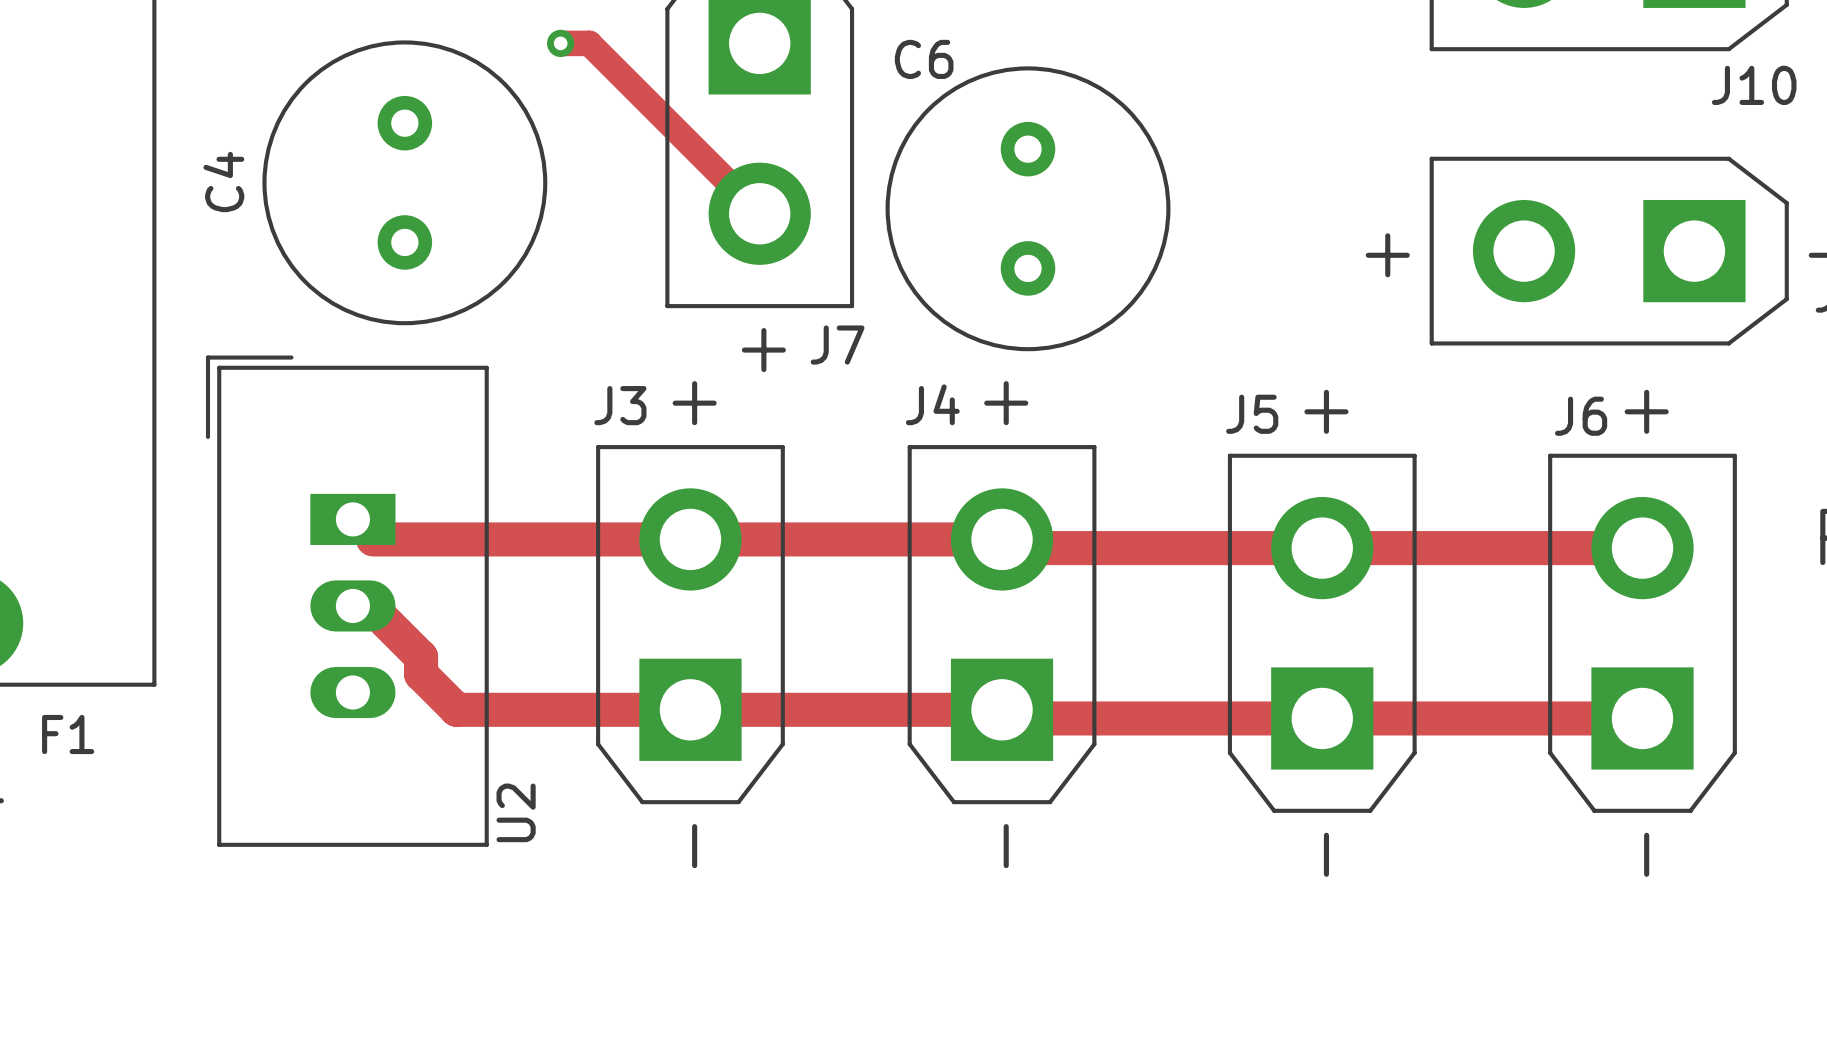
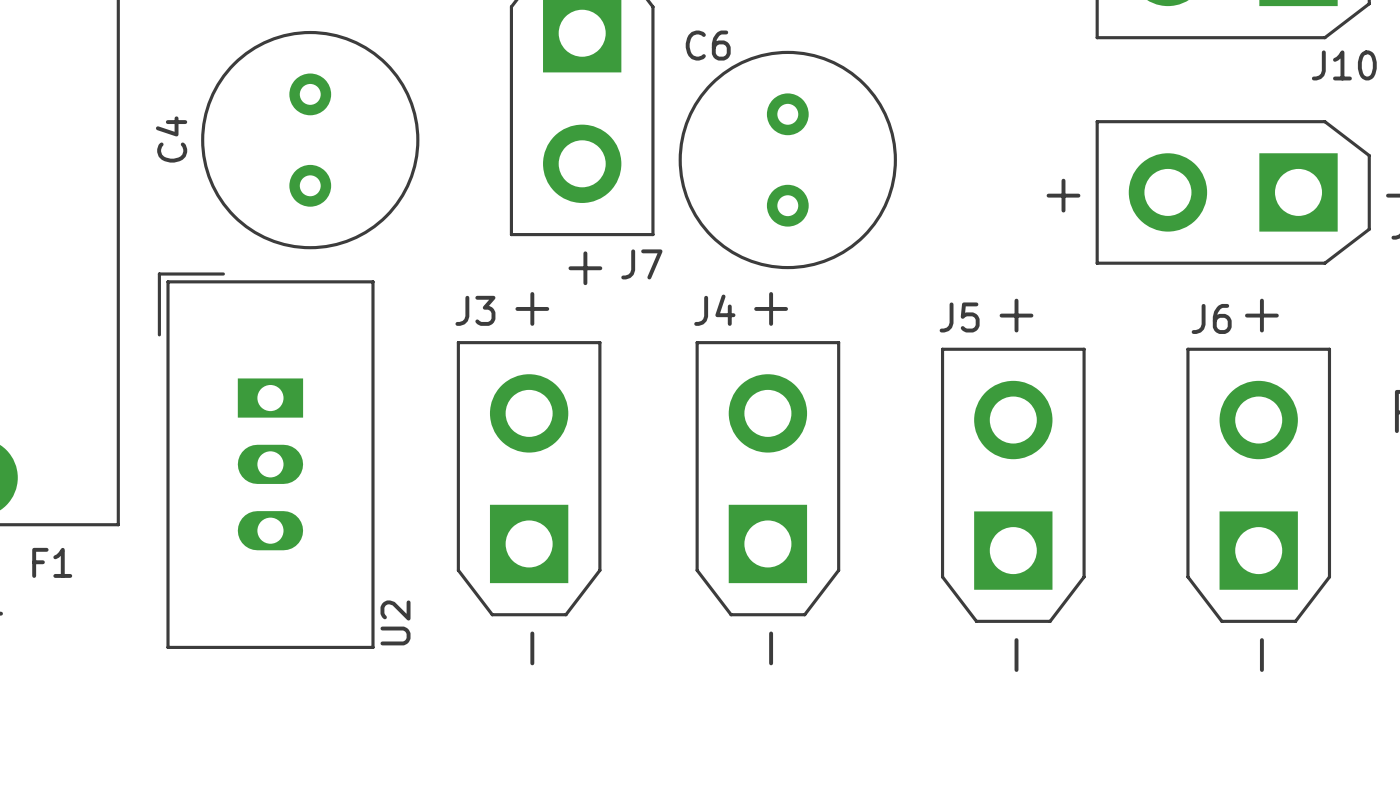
track: (560, 43) (589, 43) (759, 213) -> none
via: (560, 43) -> none
track: (352, 519) (372, 539) (1002, 539) (1010, 548) (1642, 548) -> none
track: (352, 605) (369, 605) (421, 657) (421, 674) (456, 709) (1002, 709) (1010, 718) (1642, 718) -> none

